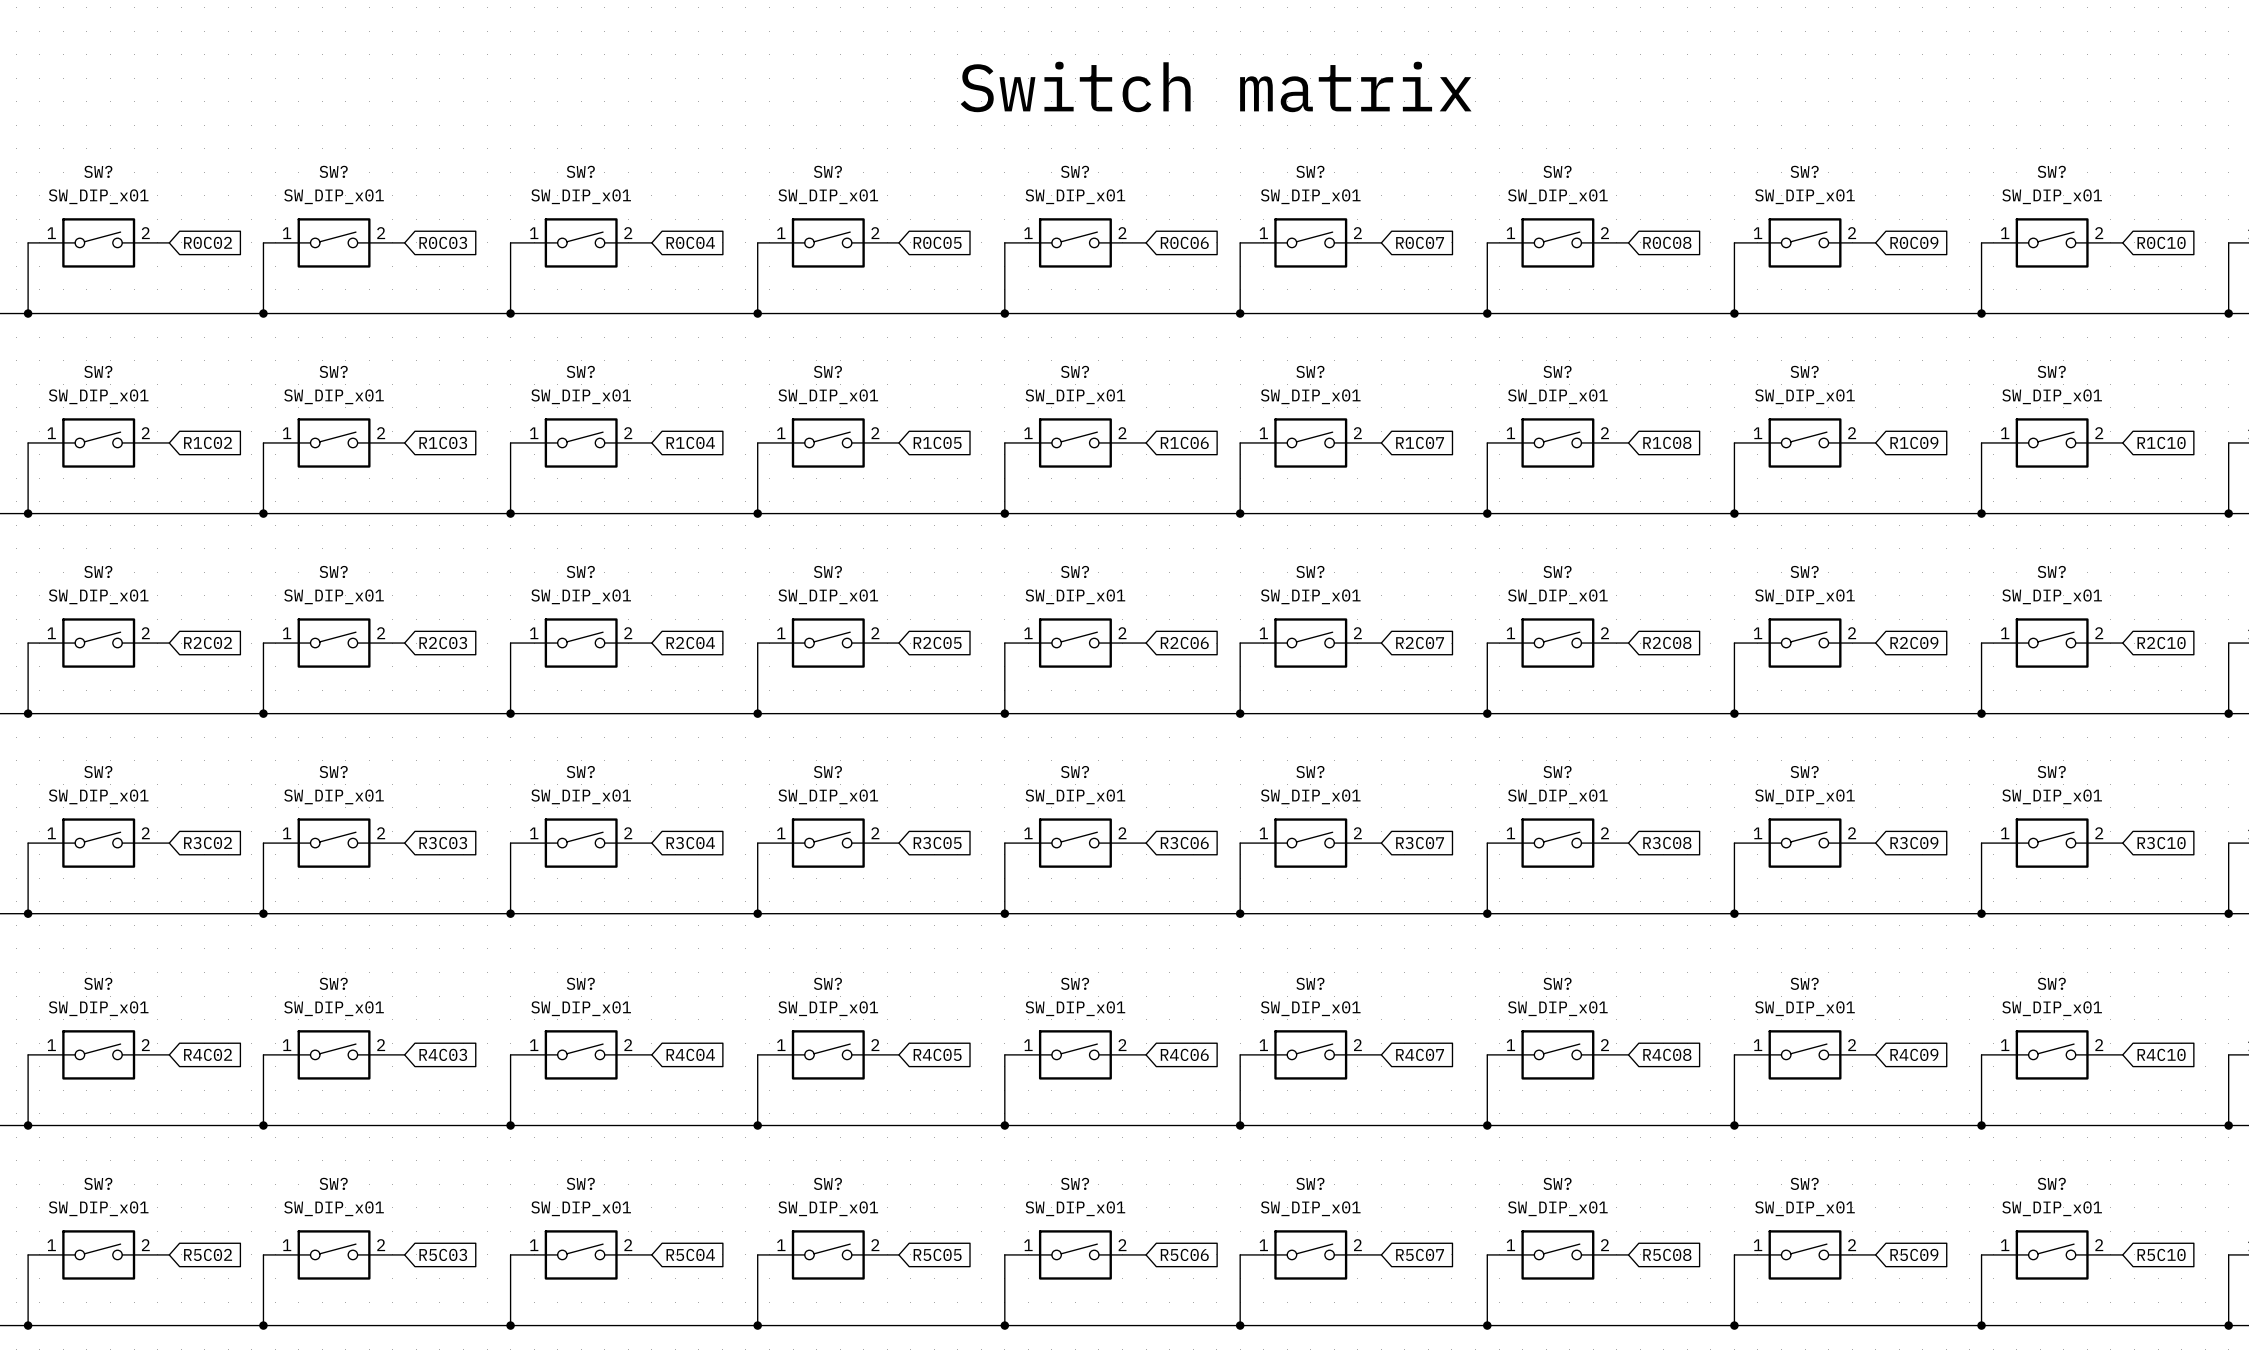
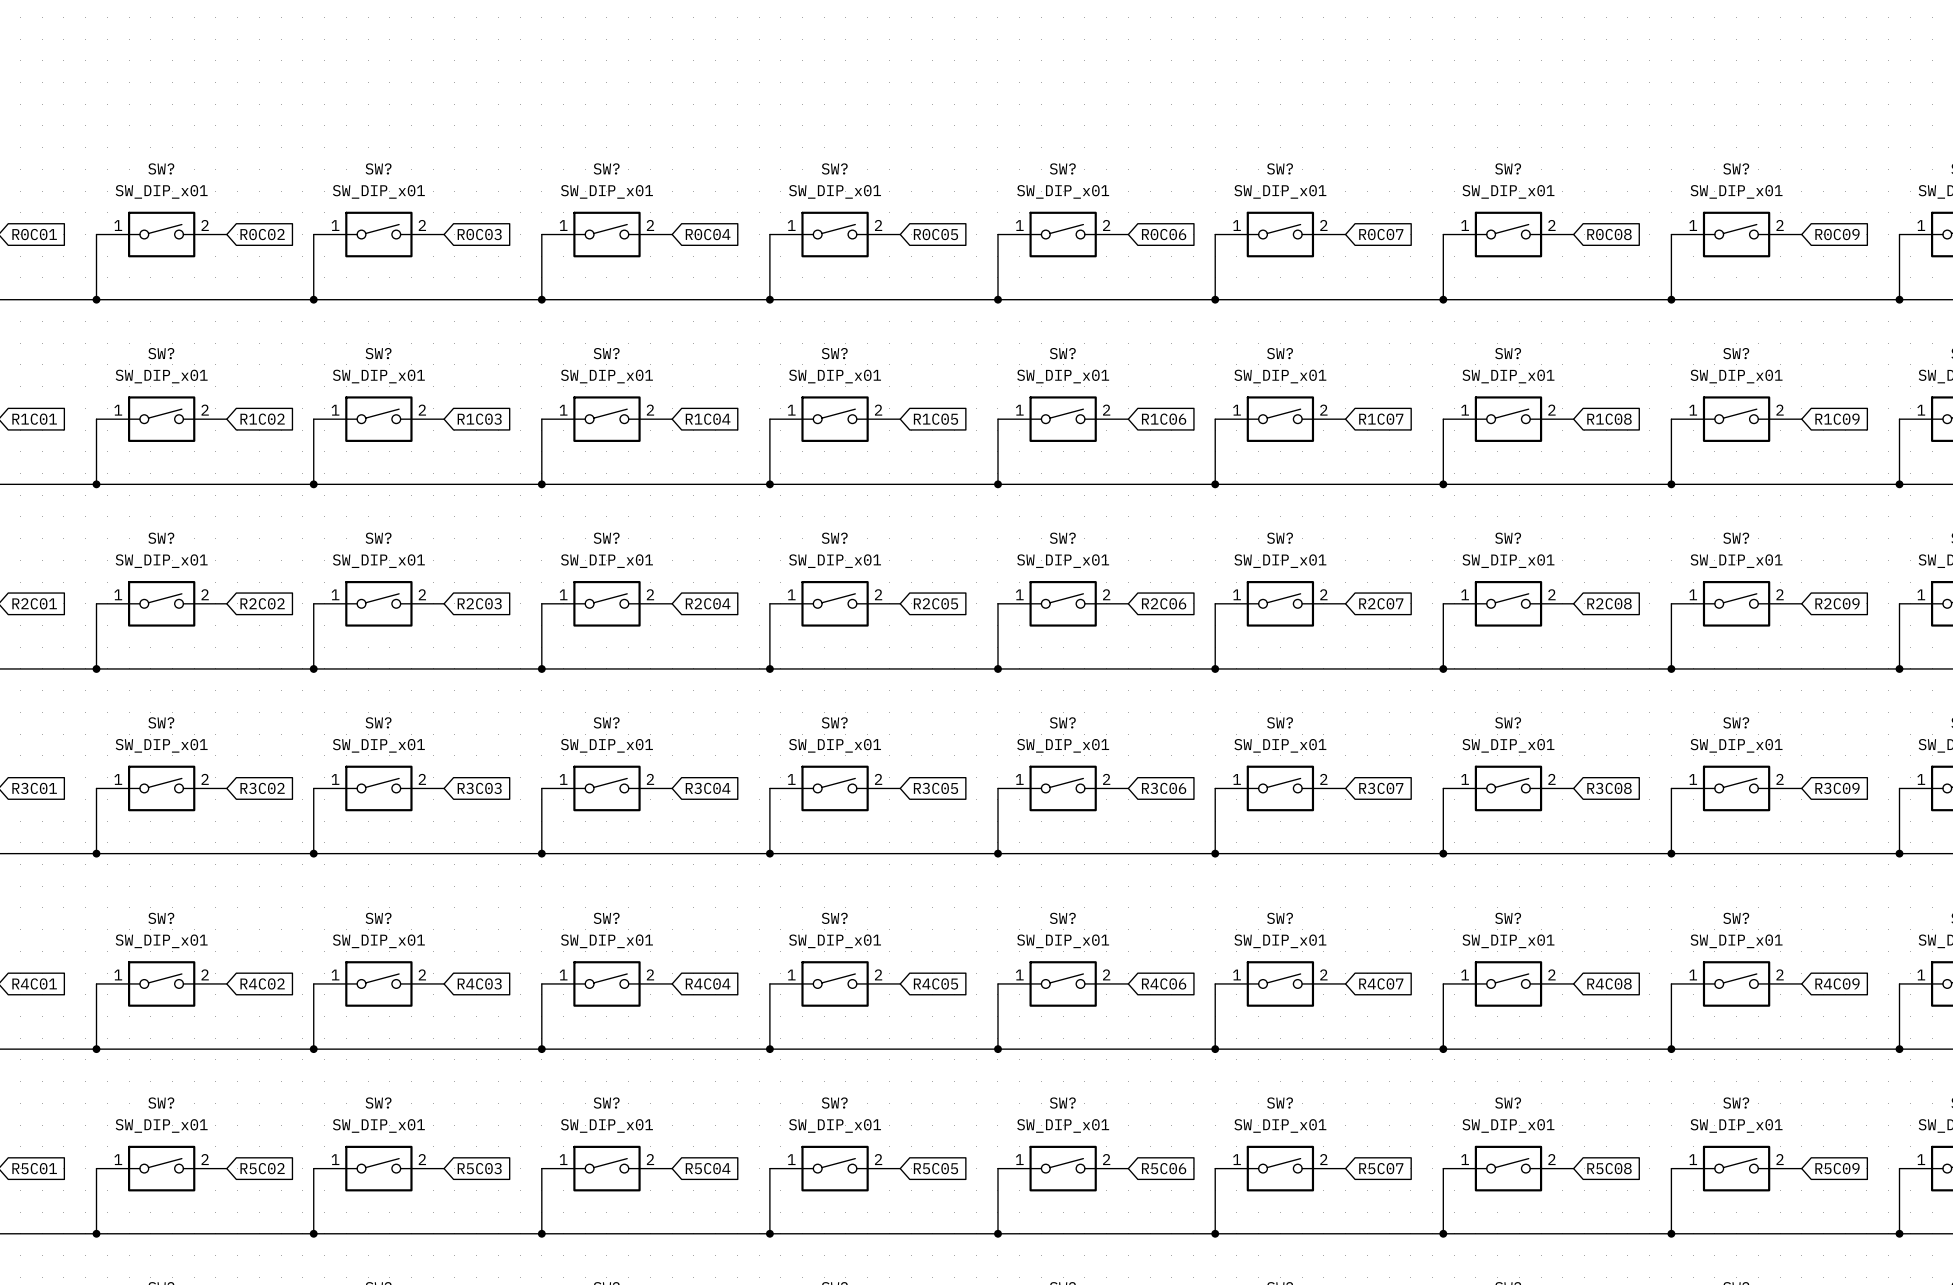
text: Switch matrix (1216, 86) -> none

